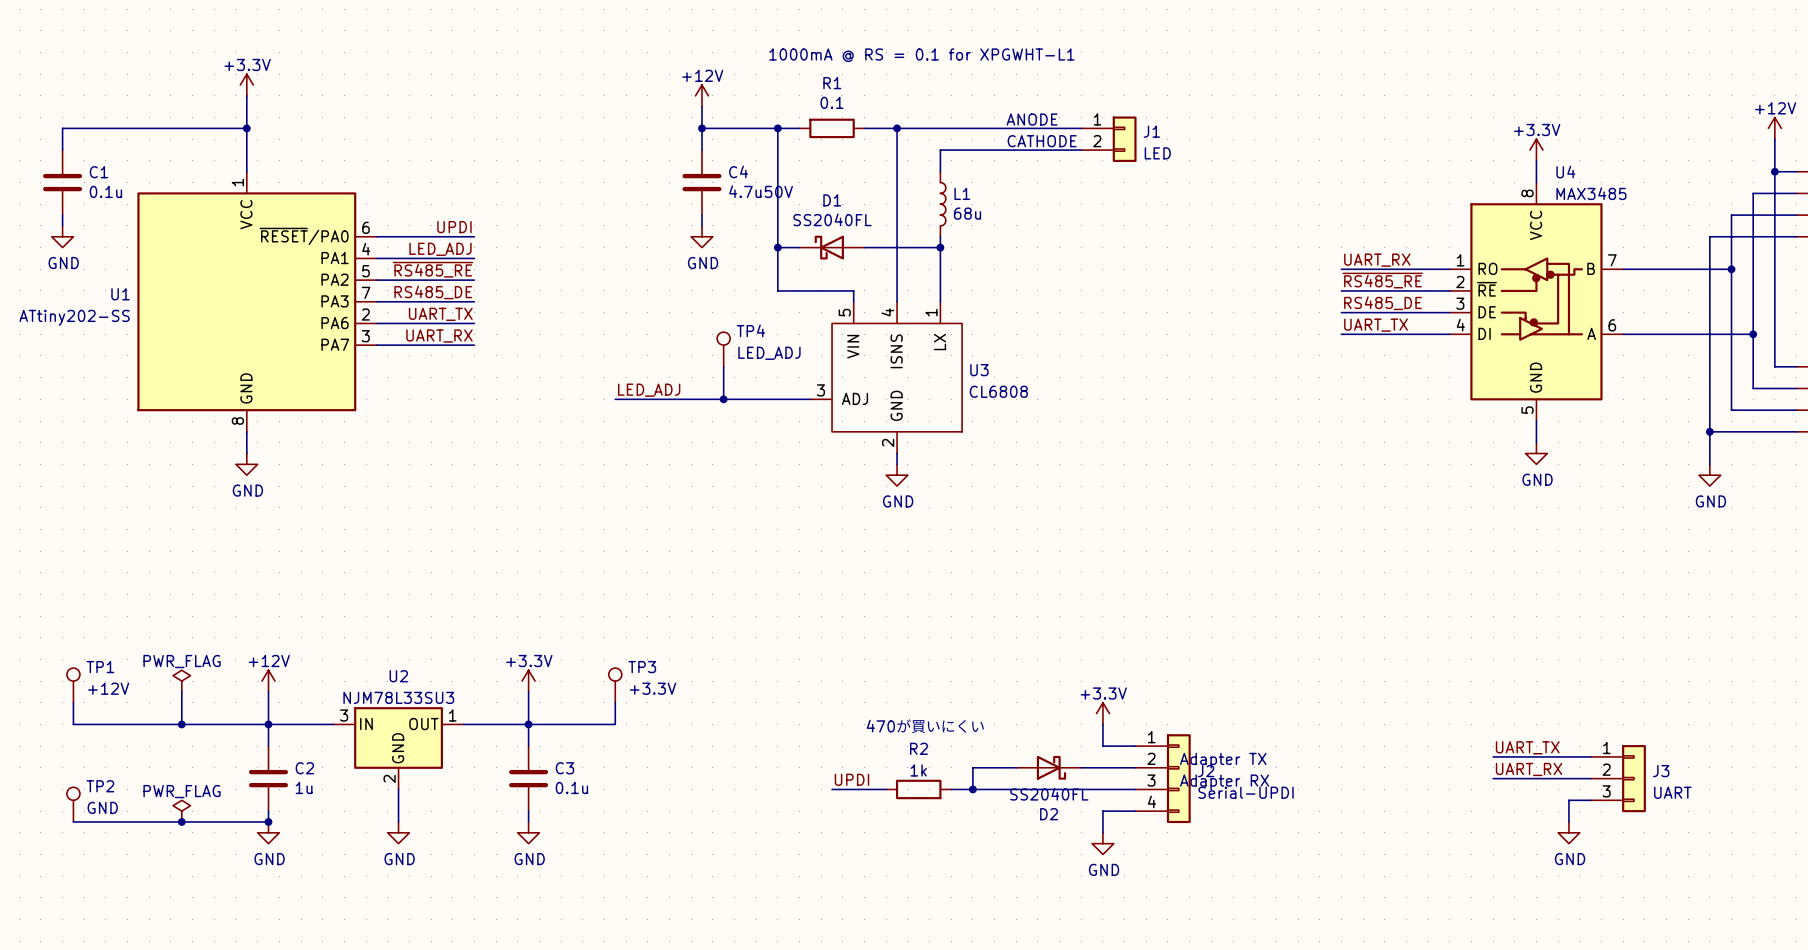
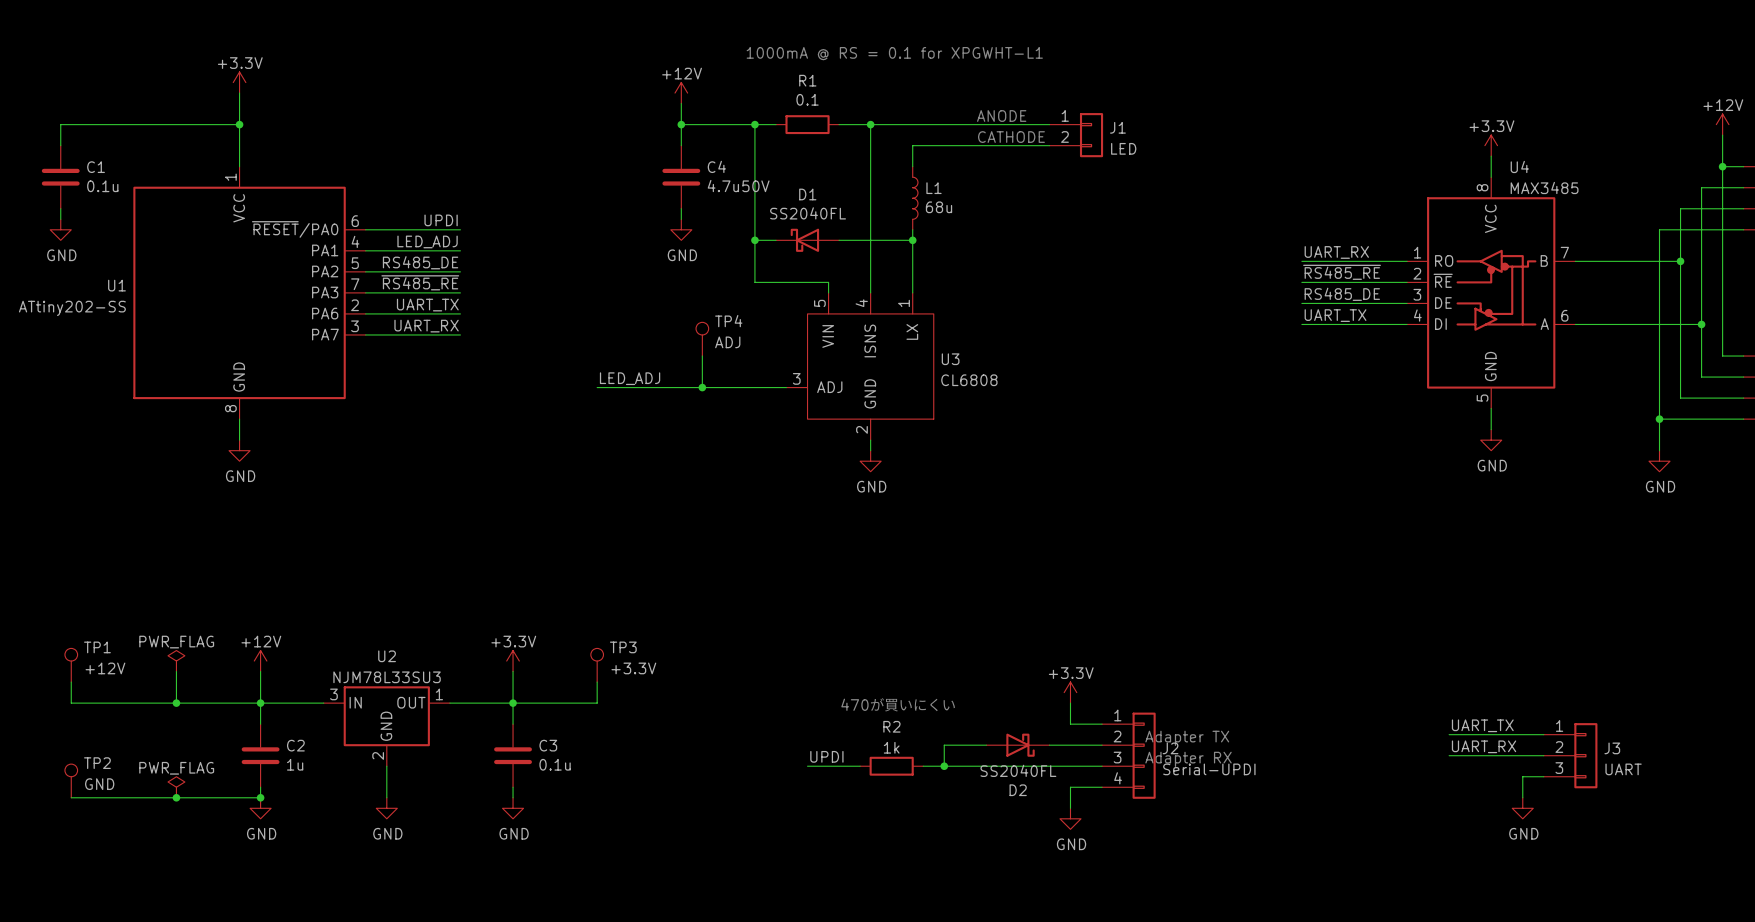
label: ~{RS485_RE} (433, 269) -> RS485_DE (420, 262)
label: RS485_DE (433, 292) -> ~{RS485_RE} (420, 282)
TP4 value: LED_ADJ (769, 353) -> ADJ (727, 342)

